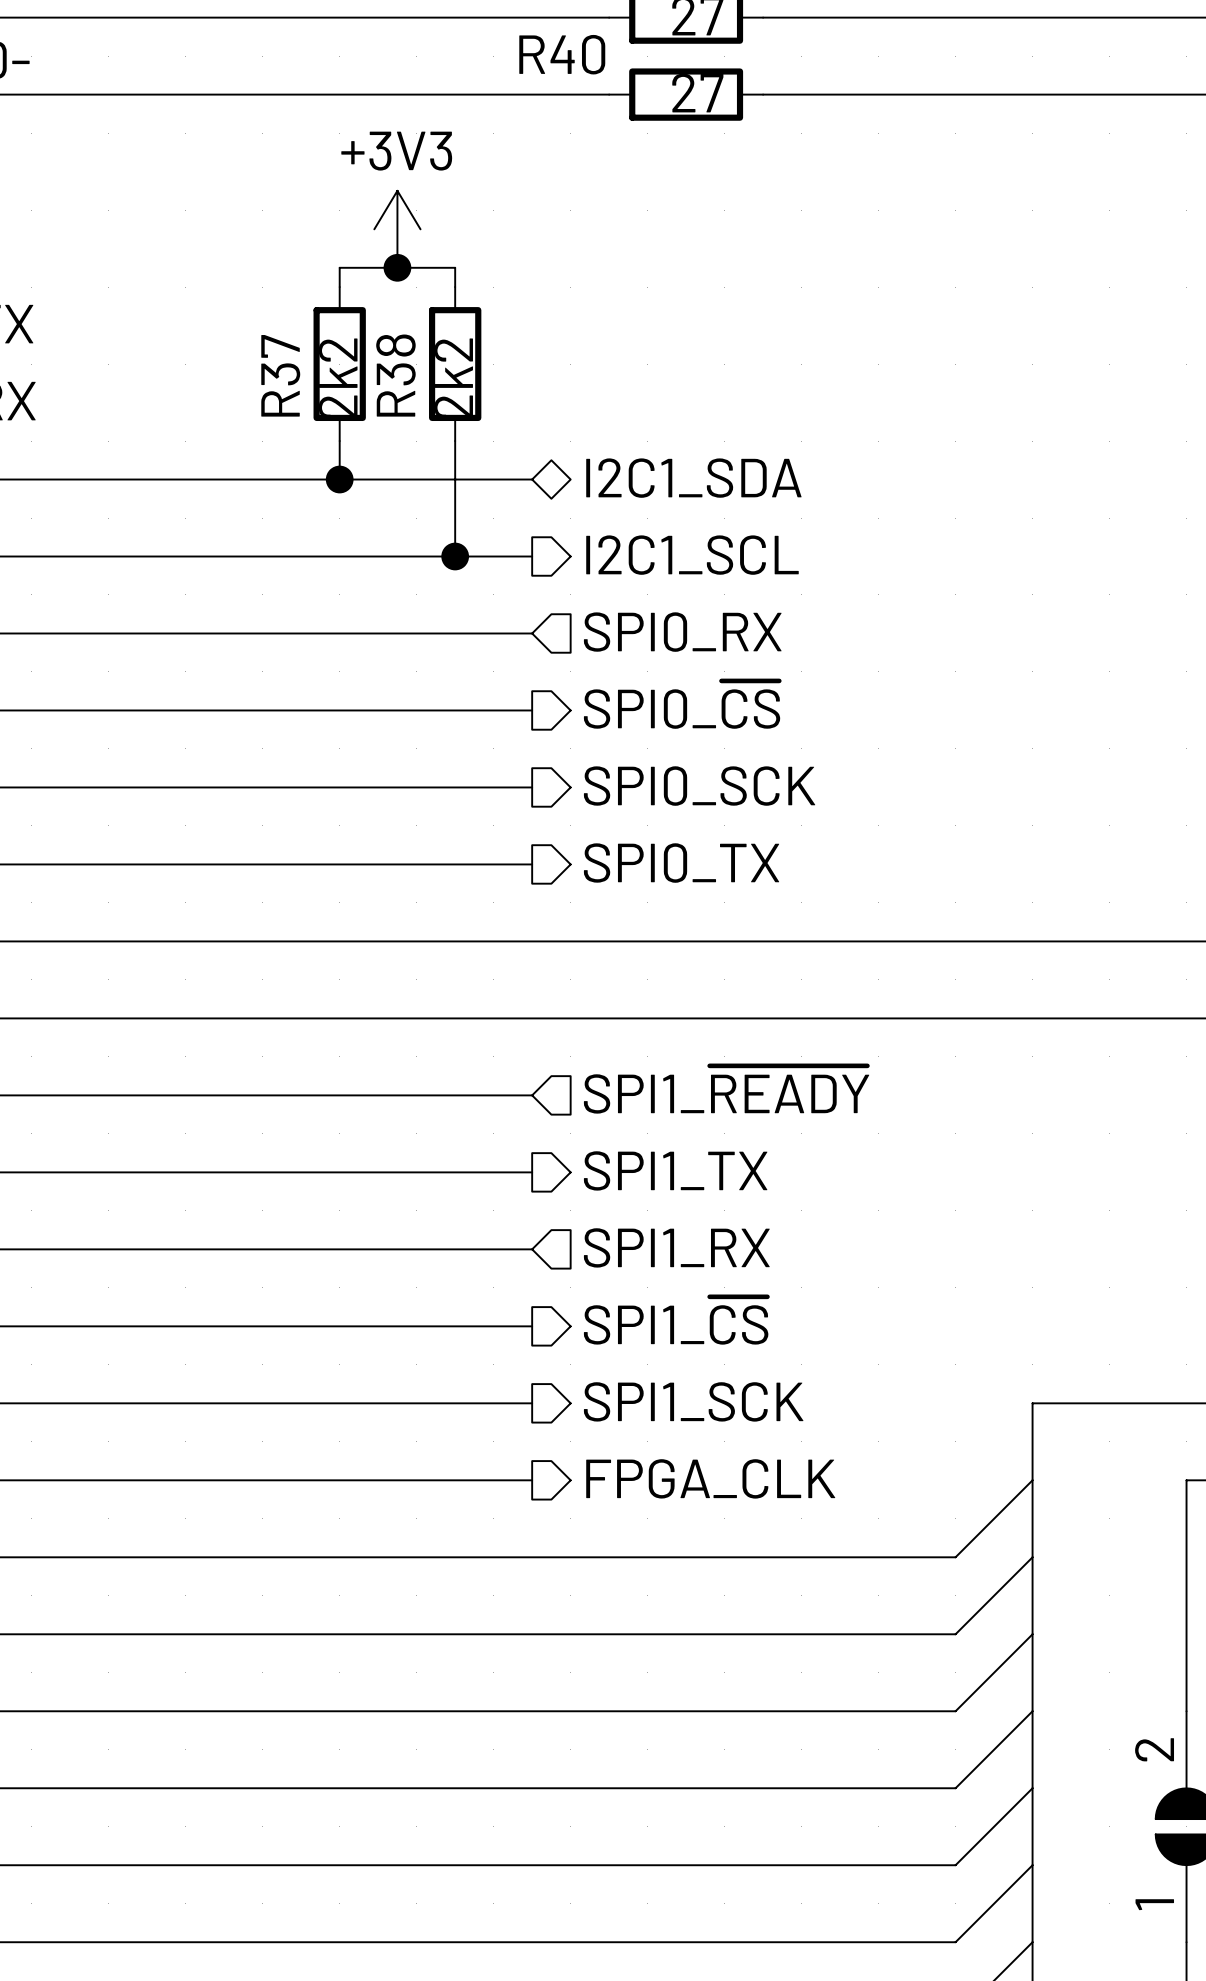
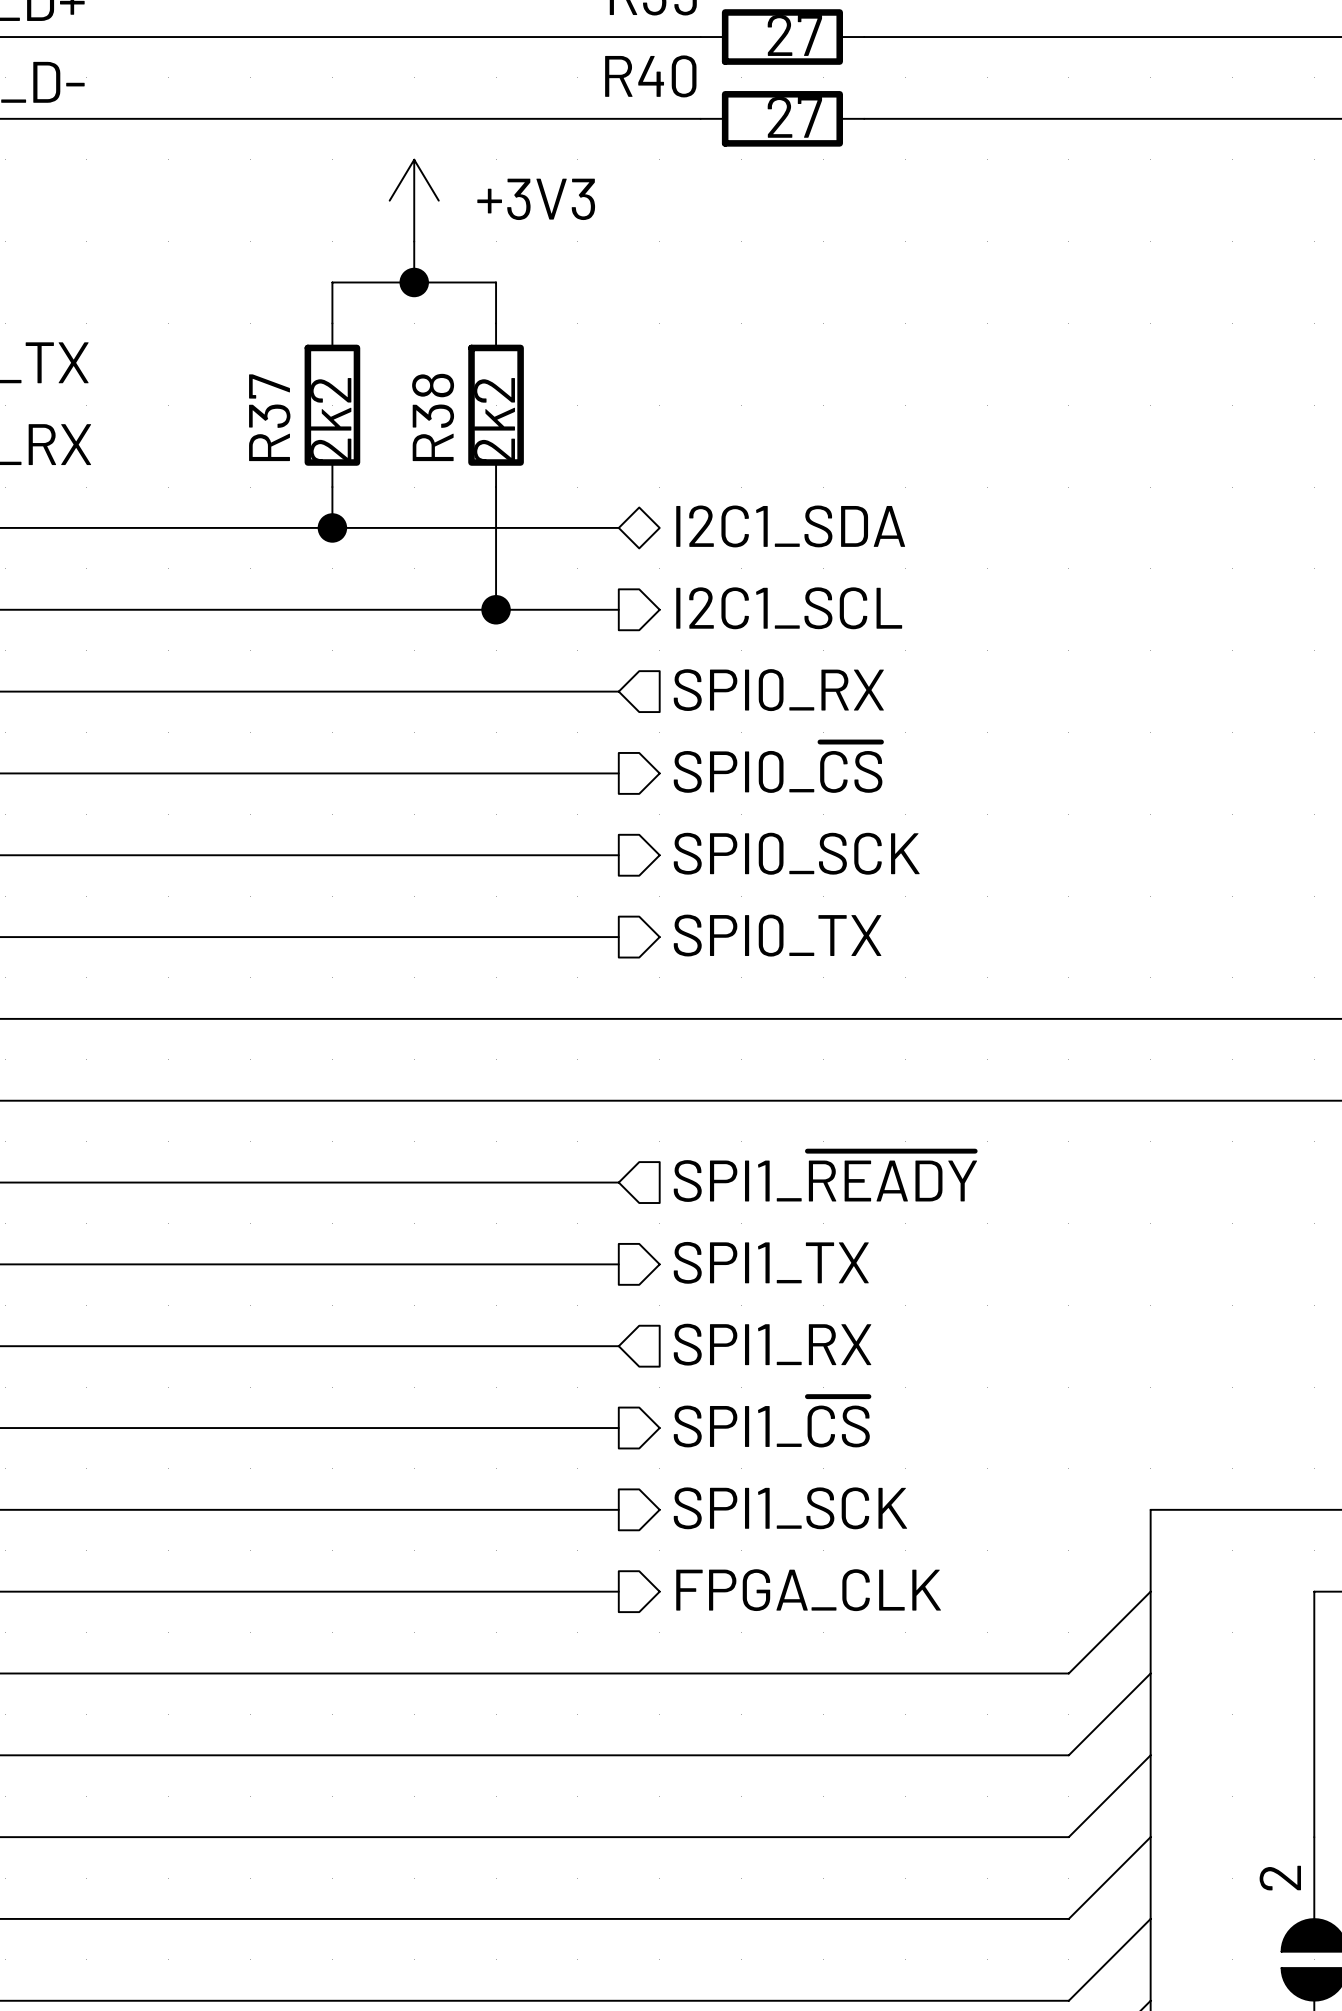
power symbol text position: +3V3 (396, 151) -> +3V3 (536, 199)
wire: none -> (414, 241) (414, 282)
power symbol position: +3V3 (397, 229) -> +3V3 (414, 200)
junction position: (397, 267) -> (414, 282)
wire: none -> (332, 323) (332, 282) (496, 282) (496, 323)
wire: (339, 287) (339, 267) (455, 267) (455, 287) -> none
R37 position: (339, 364) -> (332, 405)
R38 position: (455, 364) -> (496, 405)
wire: (339, 441) (339, 479) -> (332, 487) (332, 527)
wire: (455, 441) (455, 556) -> (496, 487) (496, 609)
junction: none -> (332, 527)
junction: (339, 479) -> none
junction position: (455, 556) -> (496, 609)

